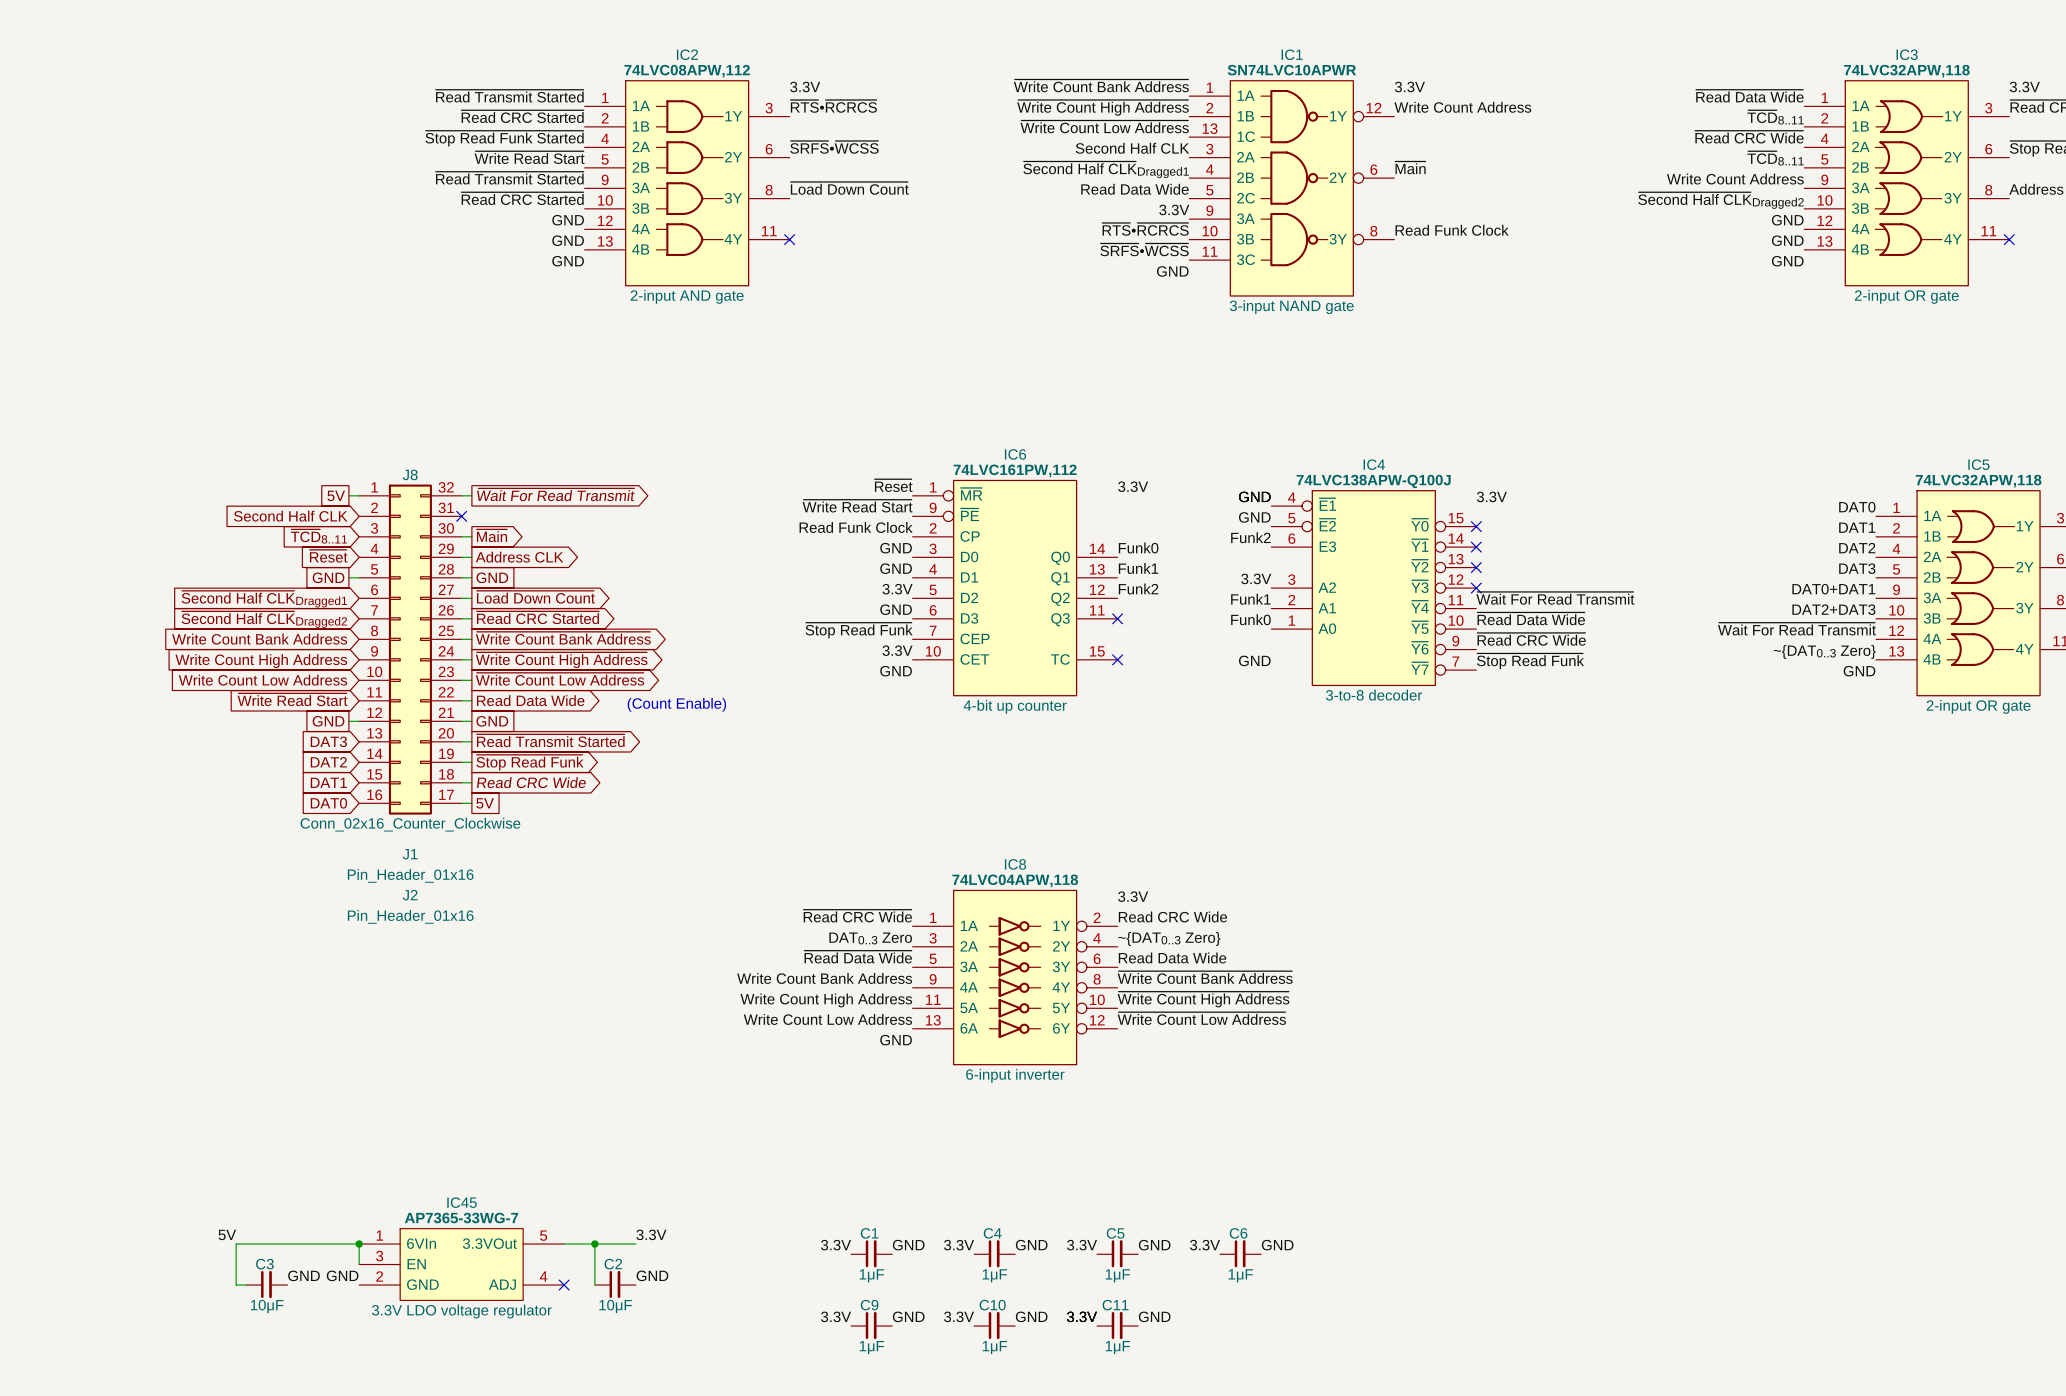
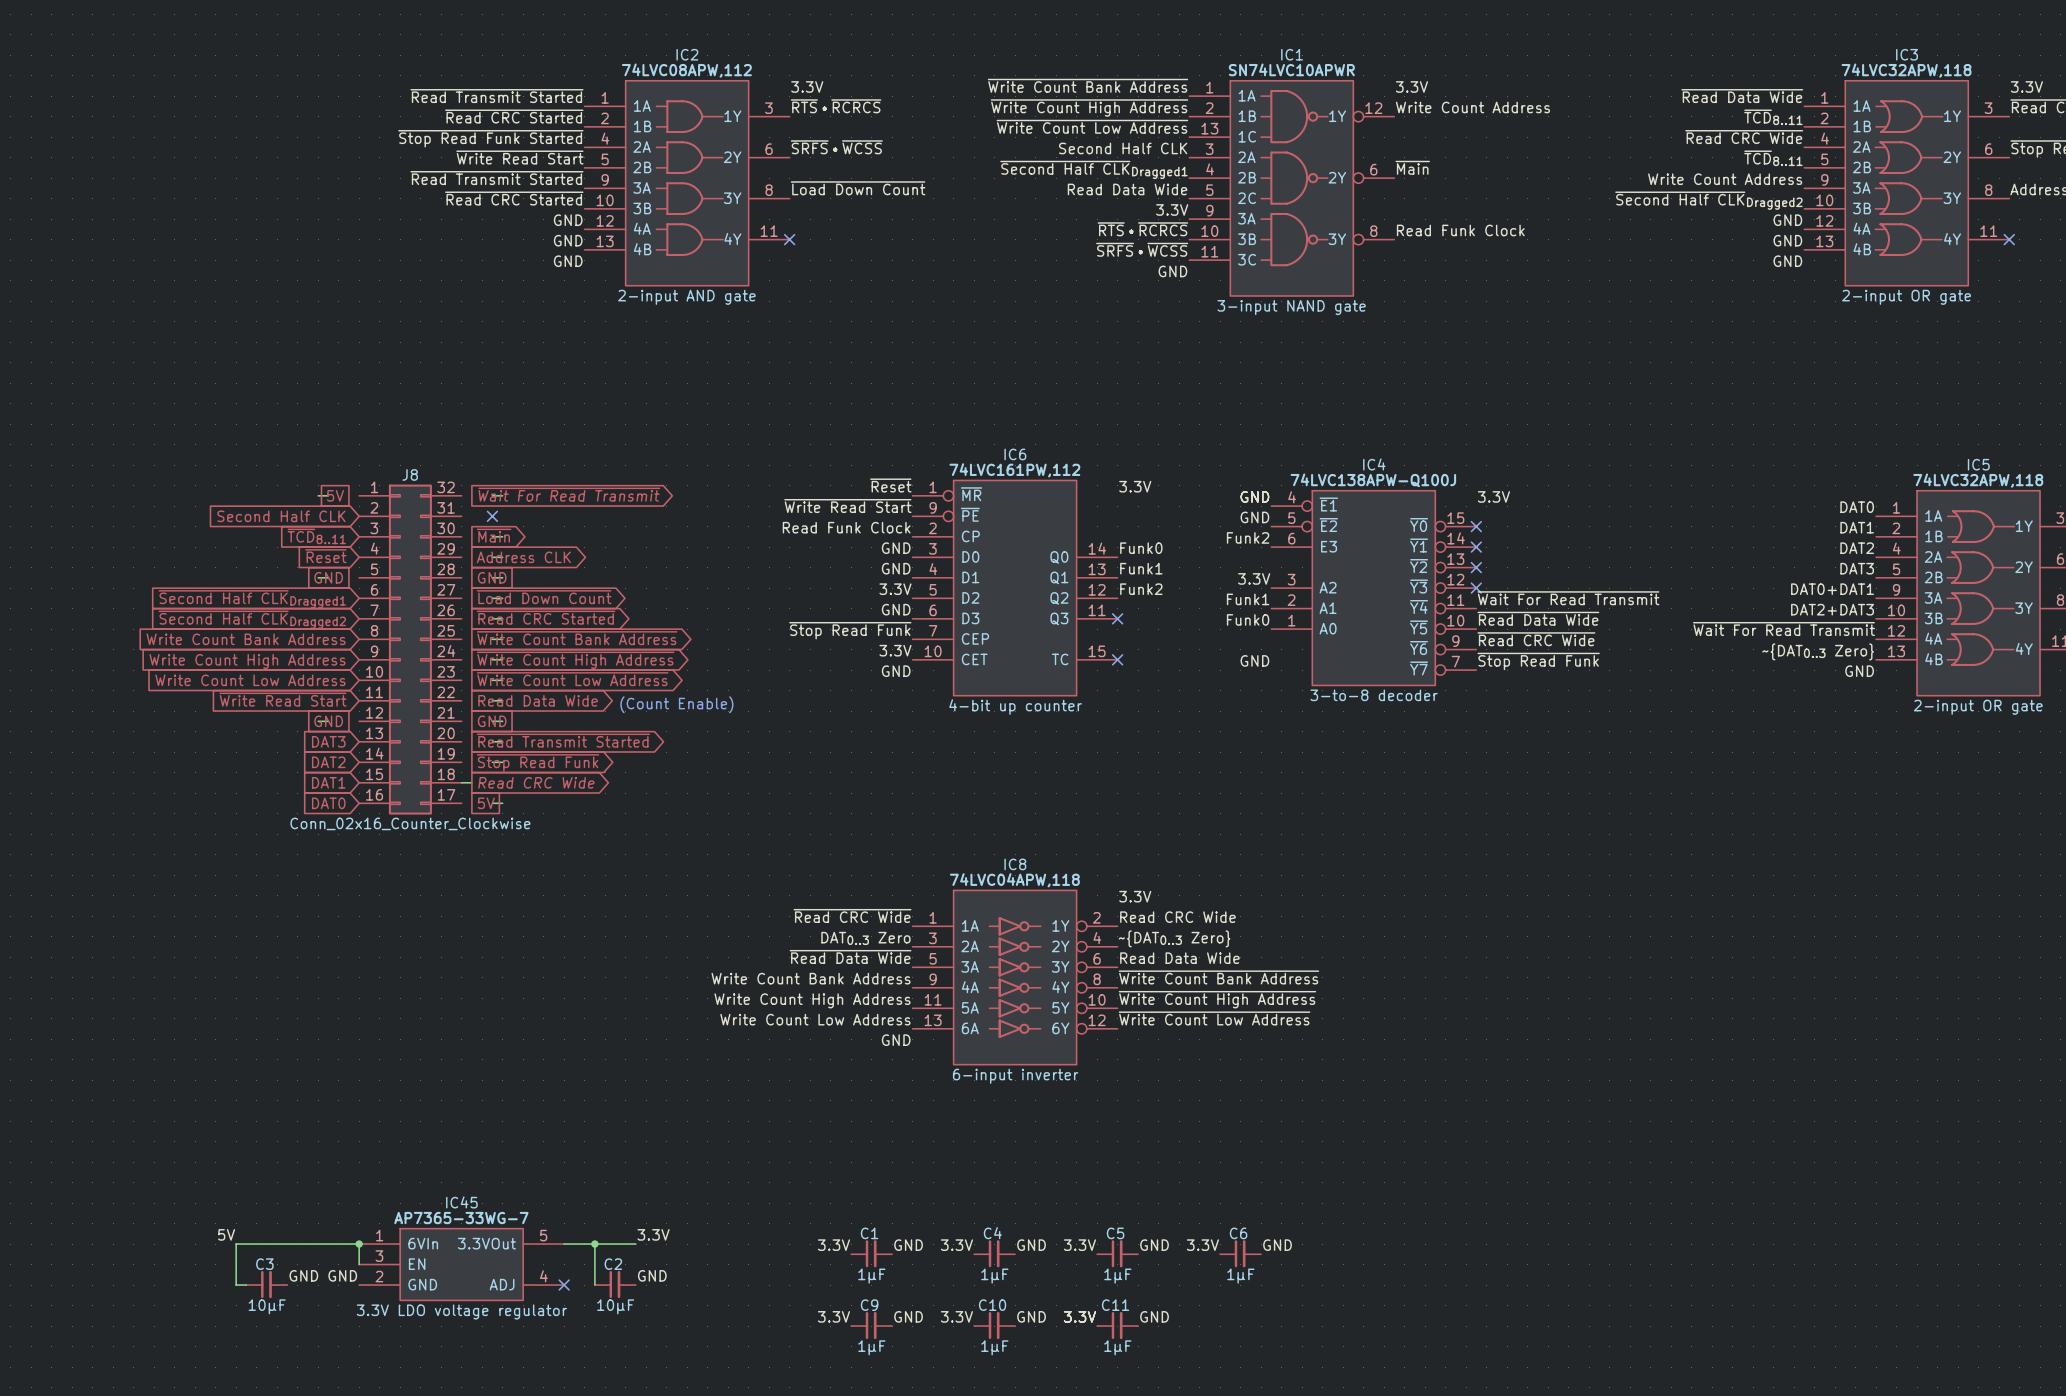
wire: (348, 495) (359, 495) -> (318, 495) (328, 495)
wire: (461, 495) (471, 495) -> (492, 495) (502, 495)
no-connect mark position: (461, 516) -> (492, 516)
wire: (461, 536) (471, 536) -> (492, 536) (502, 536)
wire: (461, 557) (471, 557) -> (492, 557) (502, 557)
wire: (348, 577) (359, 577) -> (318, 577) (328, 577)
wire: (461, 577) (471, 577) -> (492, 577) (502, 577)
wire: (461, 598) (471, 598) -> (492, 598) (502, 598)
wire: (461, 618) (471, 618) -> (492, 618) (502, 618)
wire: (461, 639) (471, 639) -> (492, 639) (502, 639)
wire: (461, 659) (471, 659) -> (492, 659) (502, 659)
wire: (461, 680) (471, 680) -> (492, 680) (502, 680)
wire: (461, 700) (471, 700) -> (492, 700) (502, 700)
wire: (348, 721) (359, 721) -> (318, 721) (328, 721)
wire: (461, 721) (471, 721) -> (492, 721) (502, 721)
wire: (461, 741) (471, 741) -> (492, 741) (502, 741)
wire: (461, 762) (471, 762) -> (492, 762) (502, 762)
wire: (461, 803) (471, 803) -> (492, 803) (502, 803)
J1: Pin_Header_01x16 (410, 865) -> none
J2: Pin_Header_01x16 (410, 906) -> none

